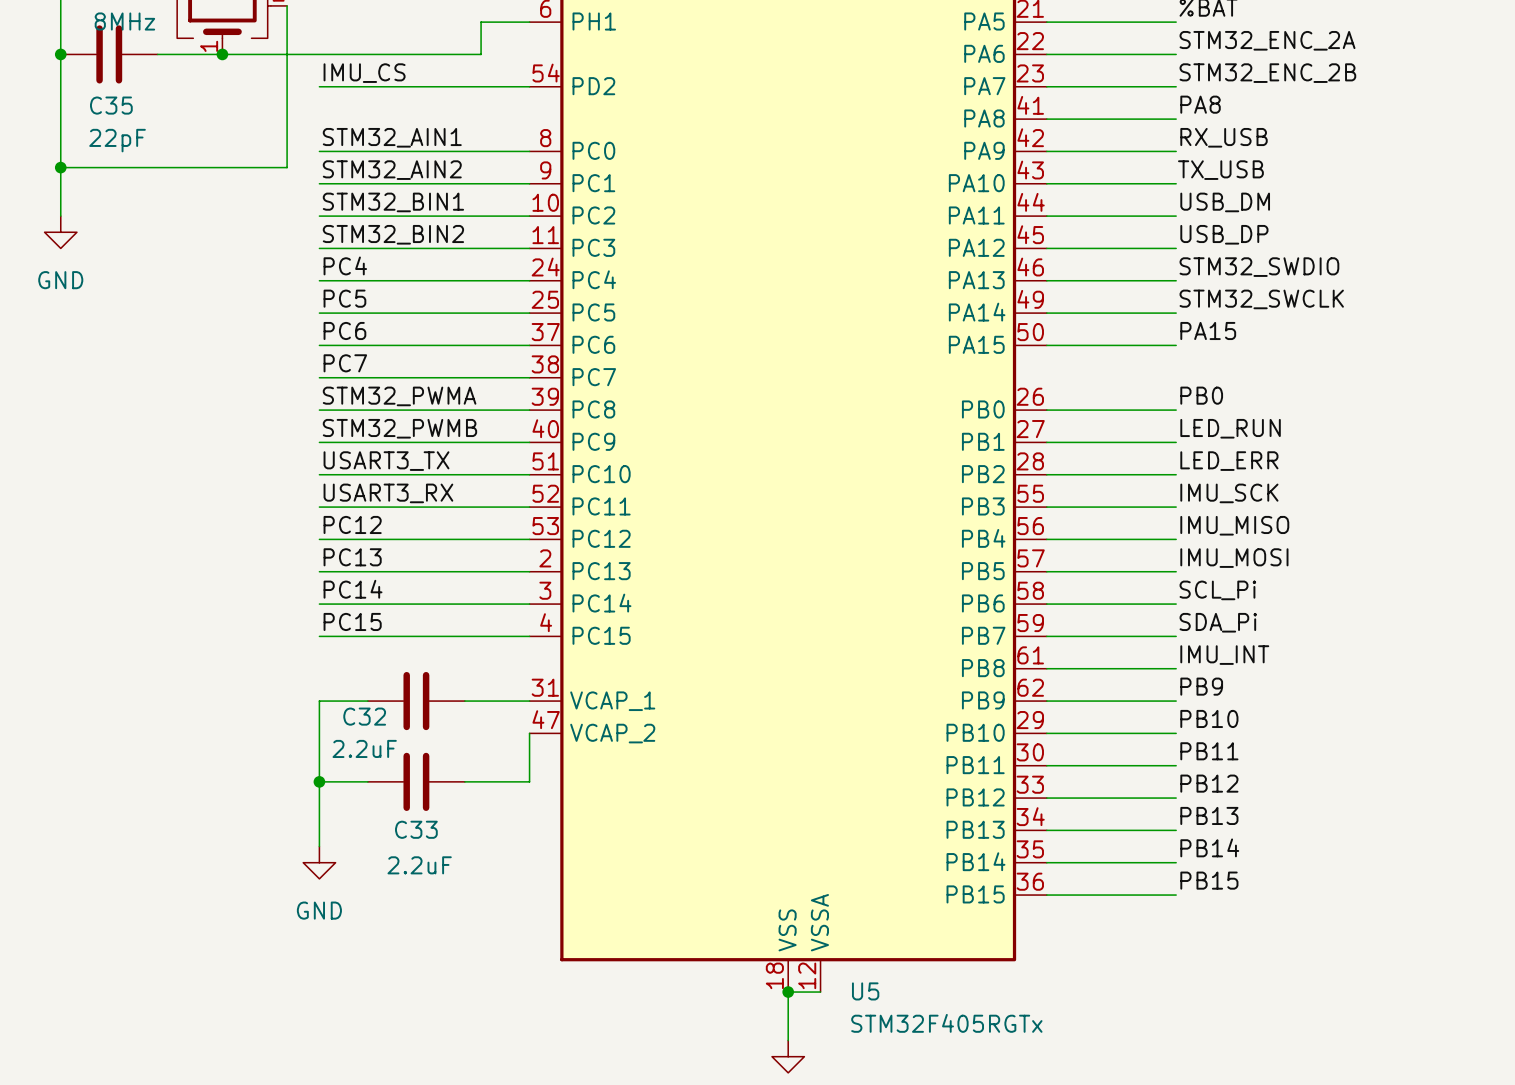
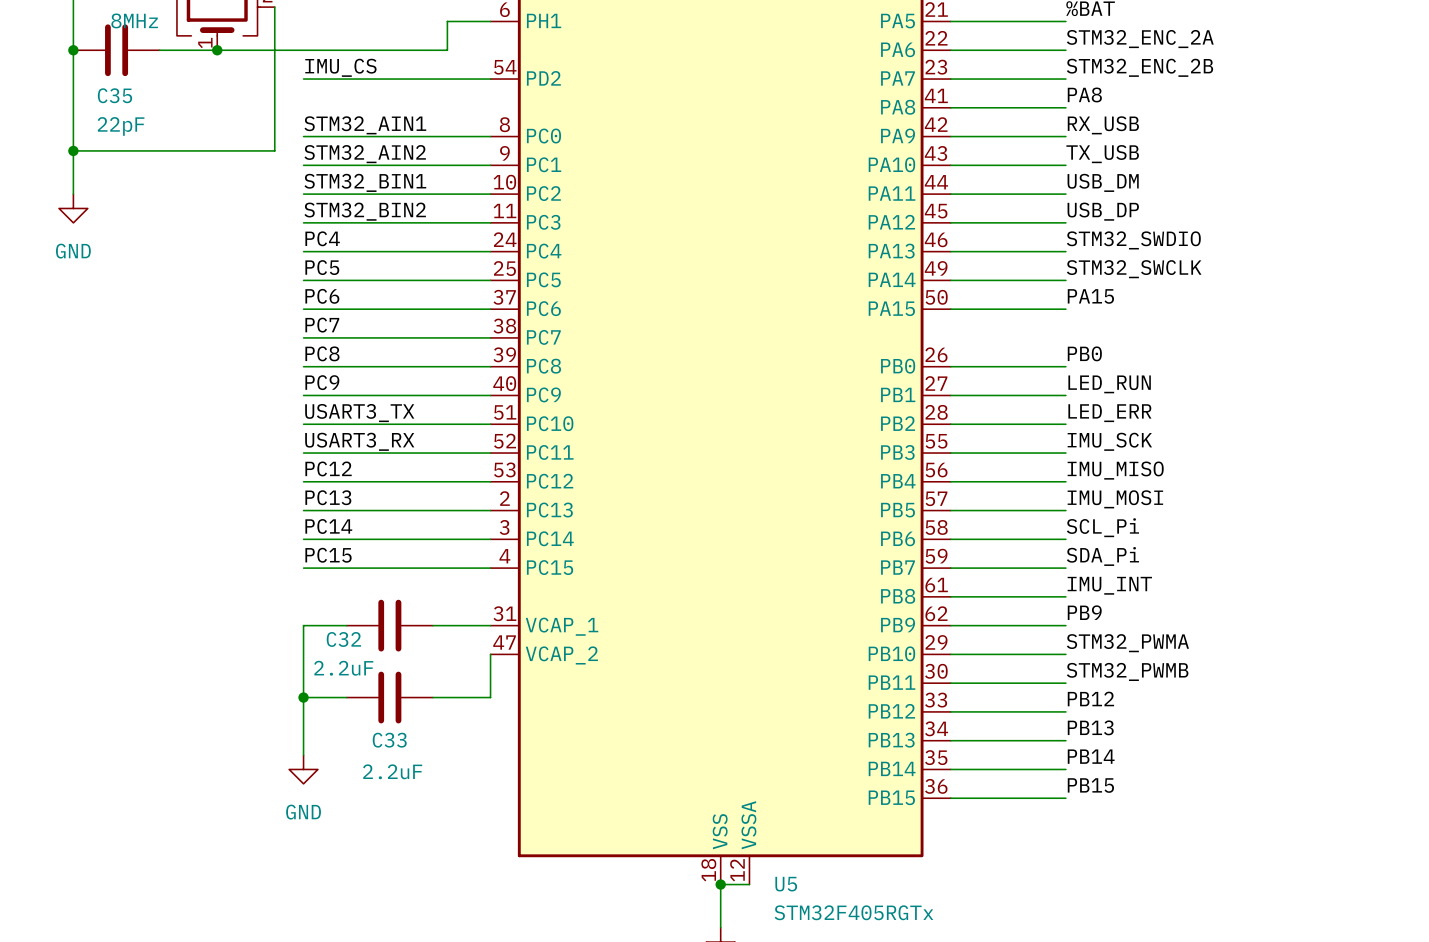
label: STM32_PWMA (399, 396) -> PC8 (322, 353)
label: STM32_PWMB (399, 428) -> PC9 (322, 382)
label: PB10 (1209, 718) -> STM32_PWMA (1127, 643)
label: PB11 (1209, 751) -> STM32_PWMB (1127, 671)

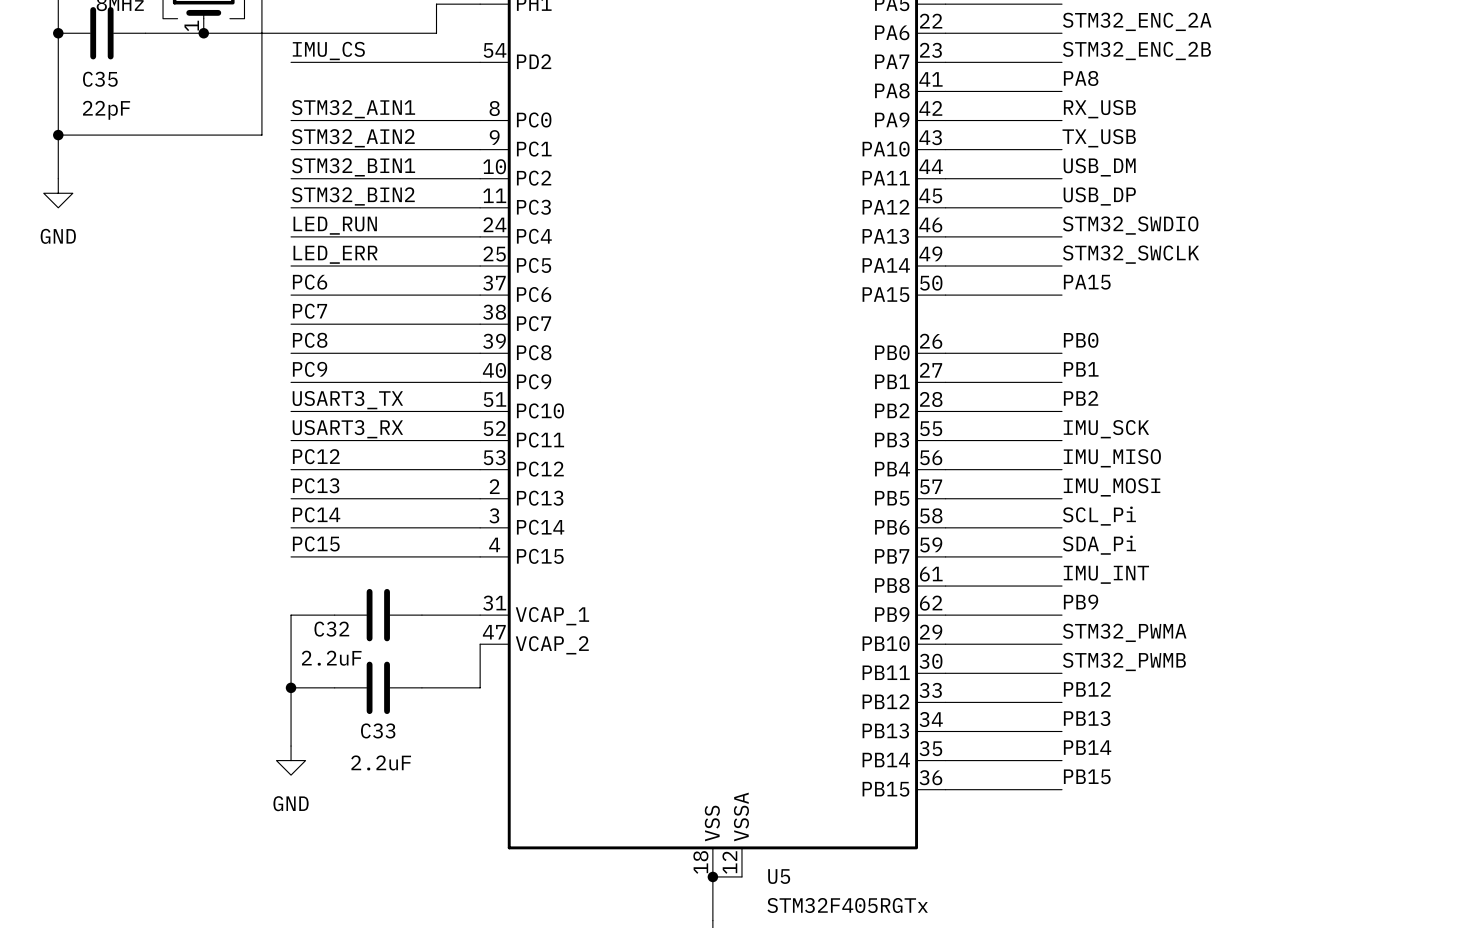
label: PC4 (322, 238) -> LED_RUN (335, 225)
label: PC5 (322, 267) -> LED_ERR (335, 254)
label: LED_RUN (1109, 384) -> PB1 (1081, 369)
label: LED_ERR (1109, 413) -> PB2 (1081, 398)

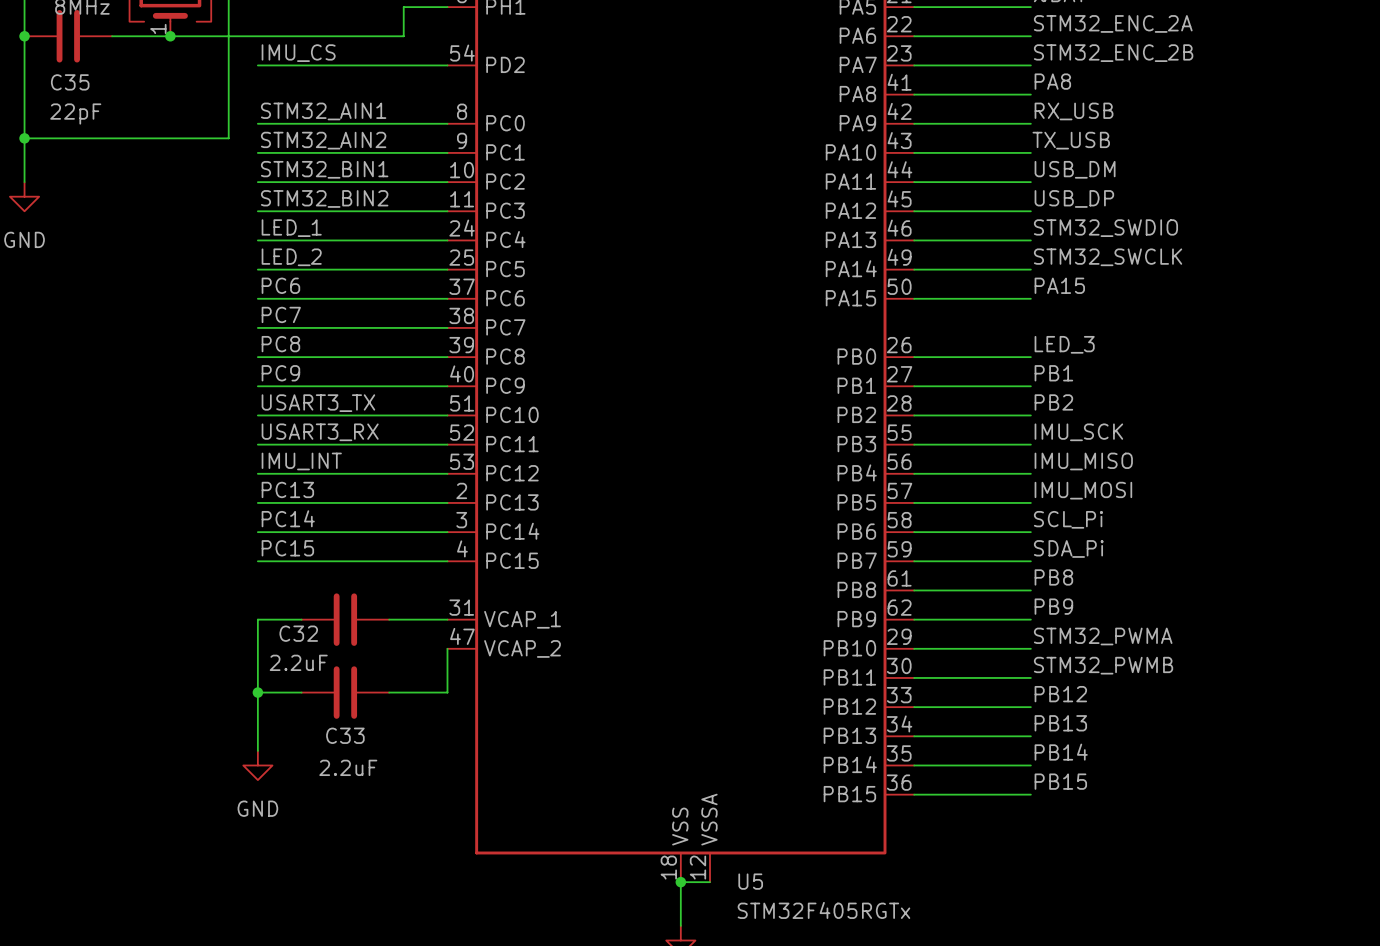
label: LED_RUN (335, 225) -> LED_1 (291, 228)
label: LED_ERR (335, 254) -> LED_2 (291, 257)
label: PB0 (1081, 340) -> LED_3 (1064, 344)
label: PC12 (316, 456) -> IMU_INT (301, 461)
label: IMU_INT (1106, 574) -> PB8 (1053, 577)

